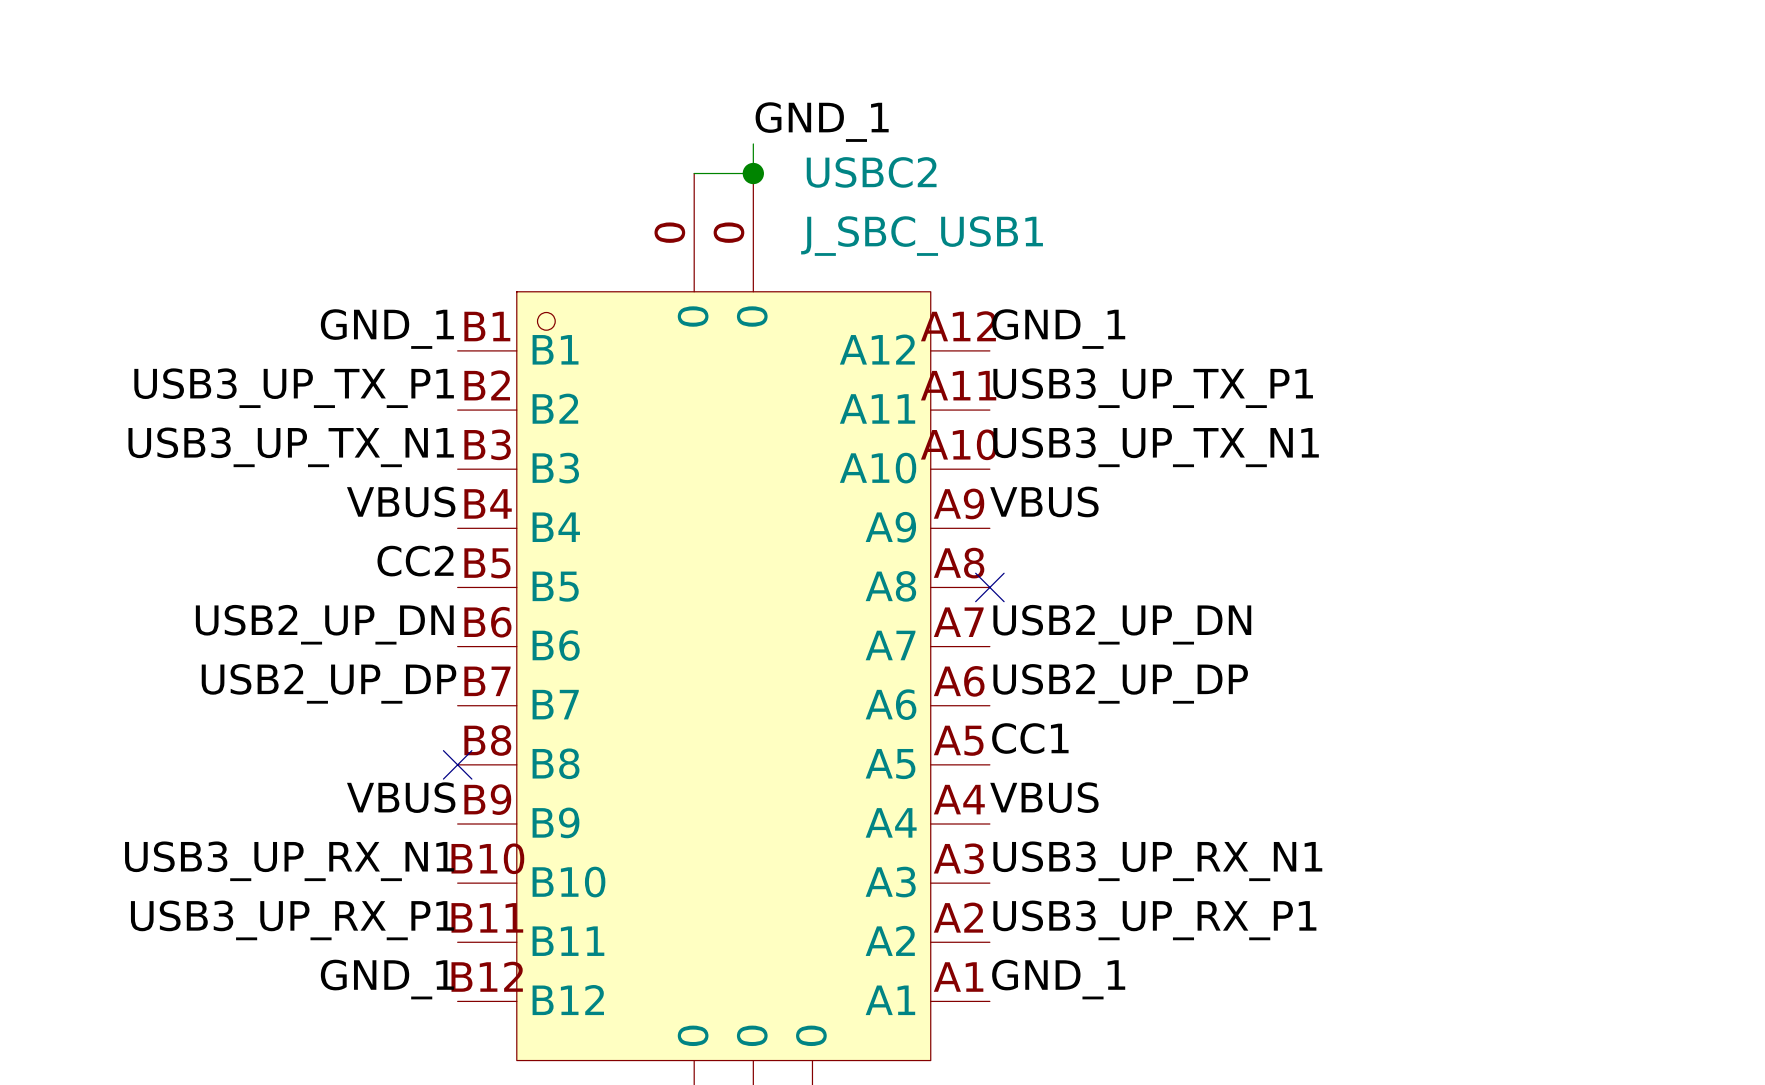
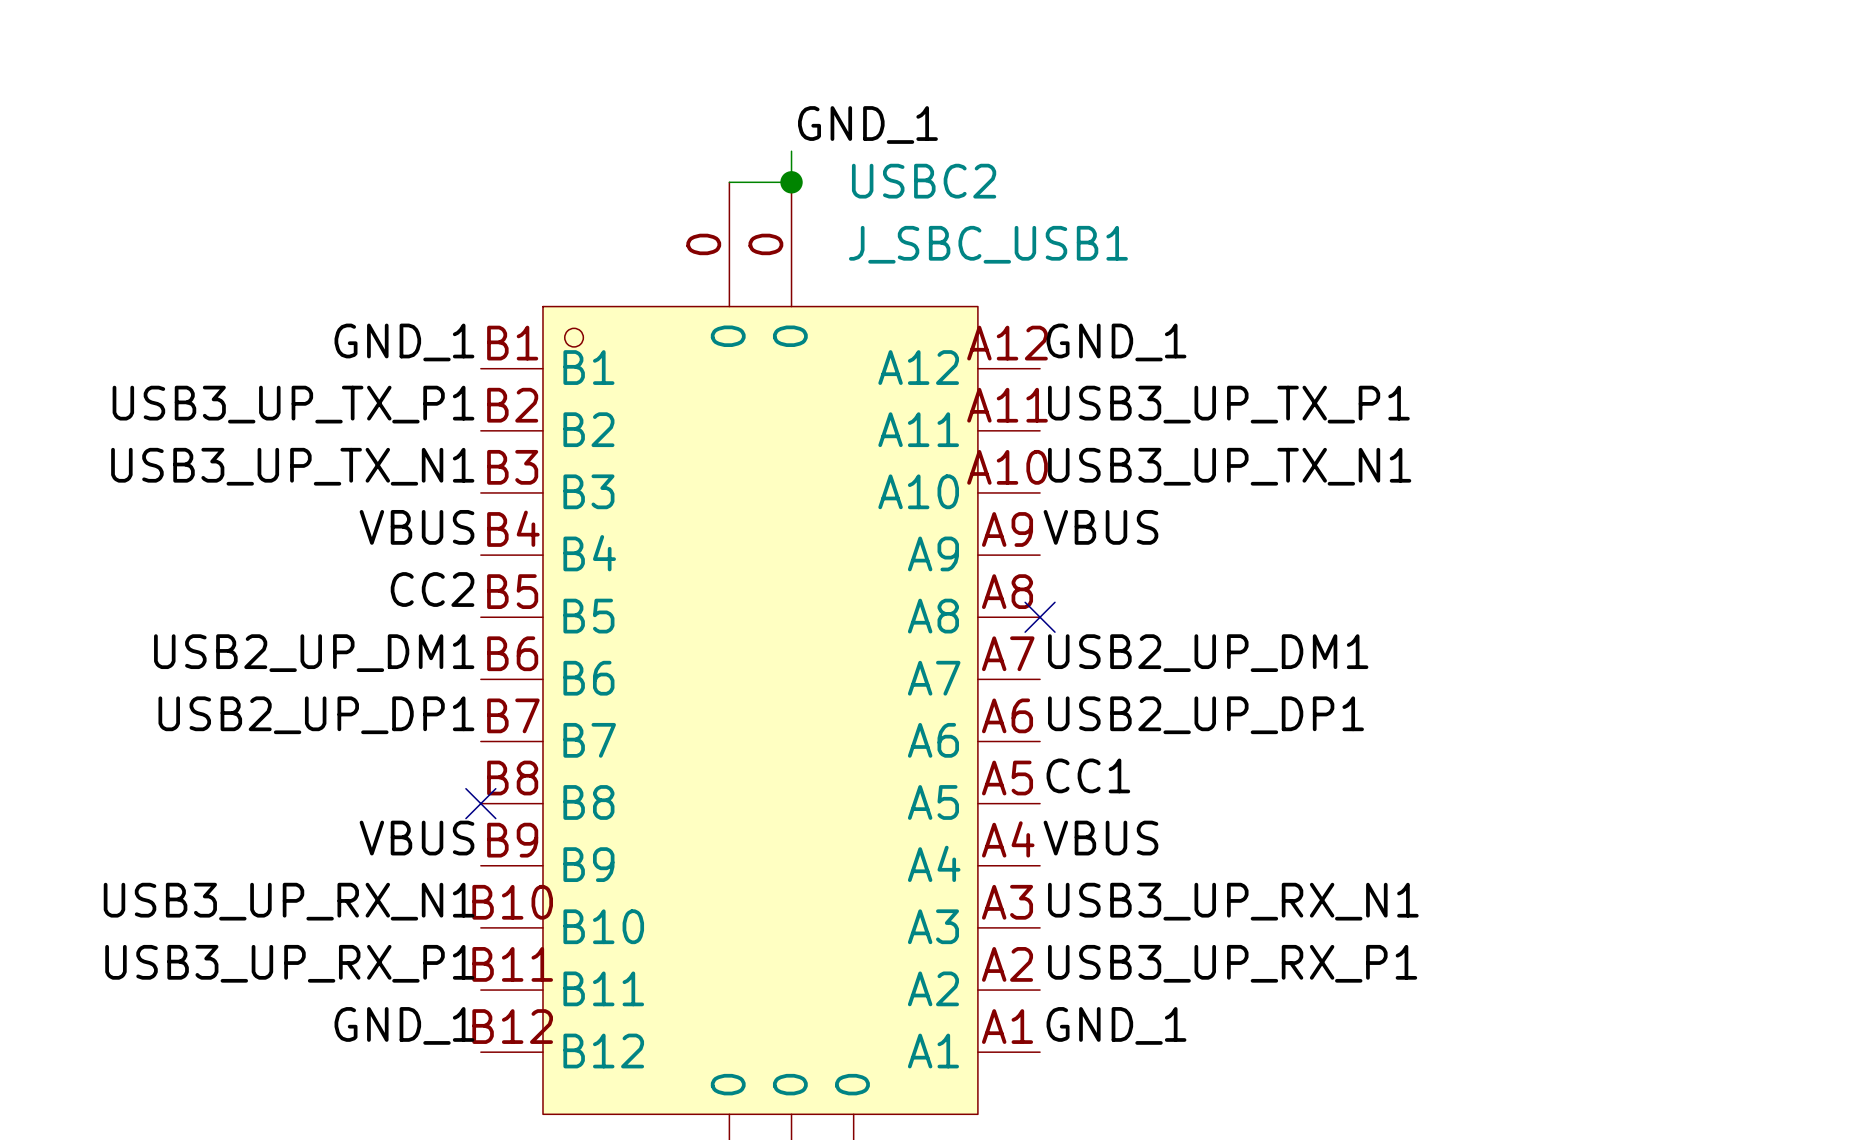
label: USB2_UP_DN (324, 624) -> USB2_UP_DM1 (314, 653)
label: USB2_UP_DN (1122, 624) -> USB2_UP_DM1 (1208, 653)
label: USB2_UP_DP (329, 683) -> USB2_UP_DP1 (316, 715)
label: USB2_UP_DP (1120, 683) -> USB2_UP_DP1 (1205, 715)

